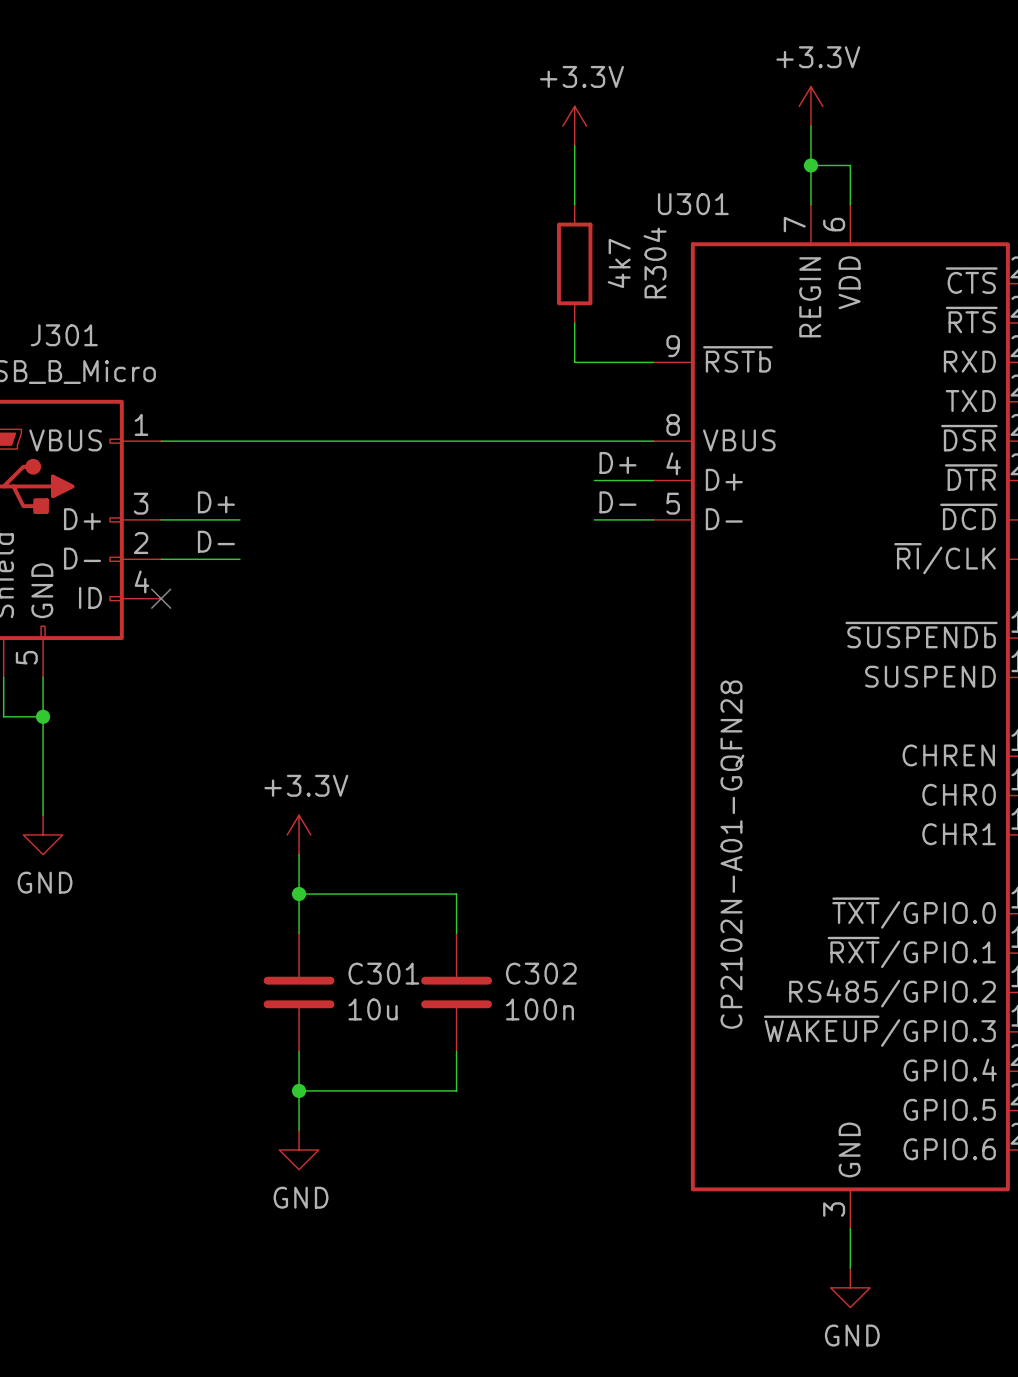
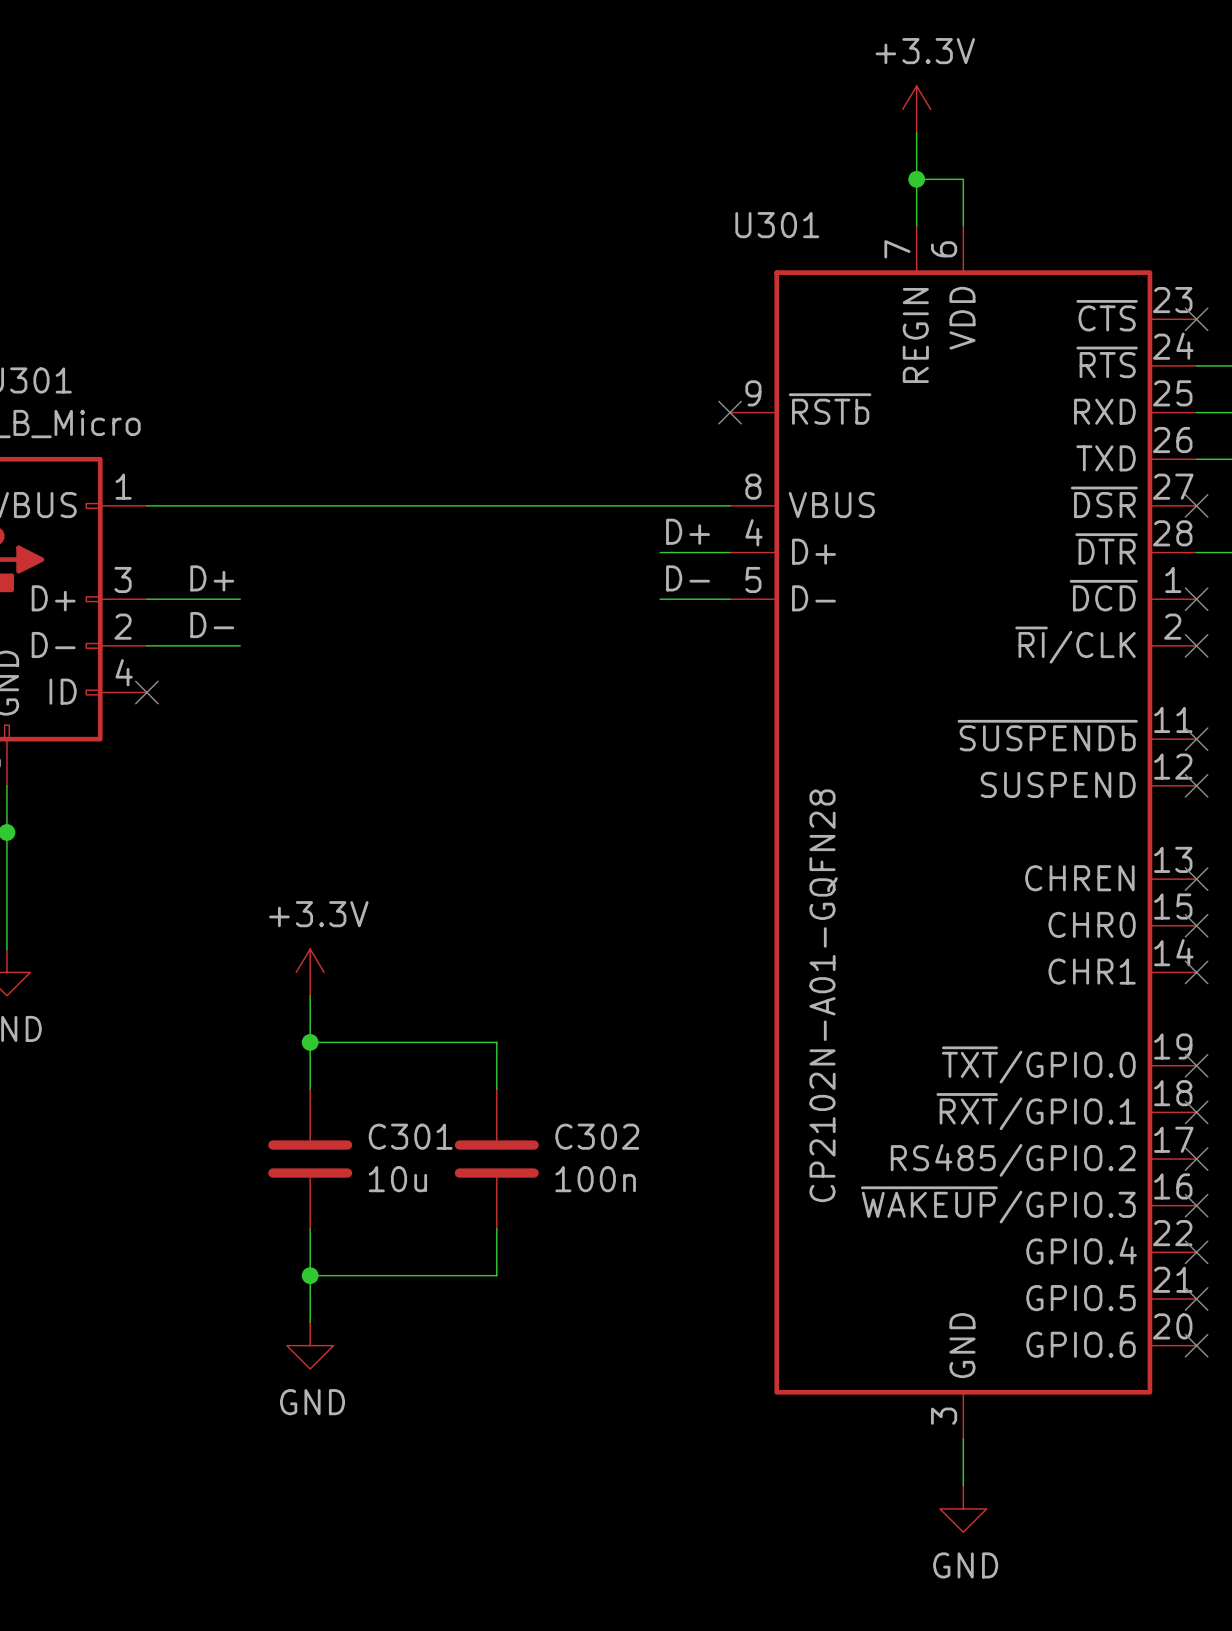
power symbol: +3.3V (574, 126) -> none
wire: (574, 145) (574, 204) -> none
R304: 4k7 (574, 263) -> none
wire: (574, 323) (574, 362) (653, 362) -> none
no-connect mark: none -> (730, 412)

